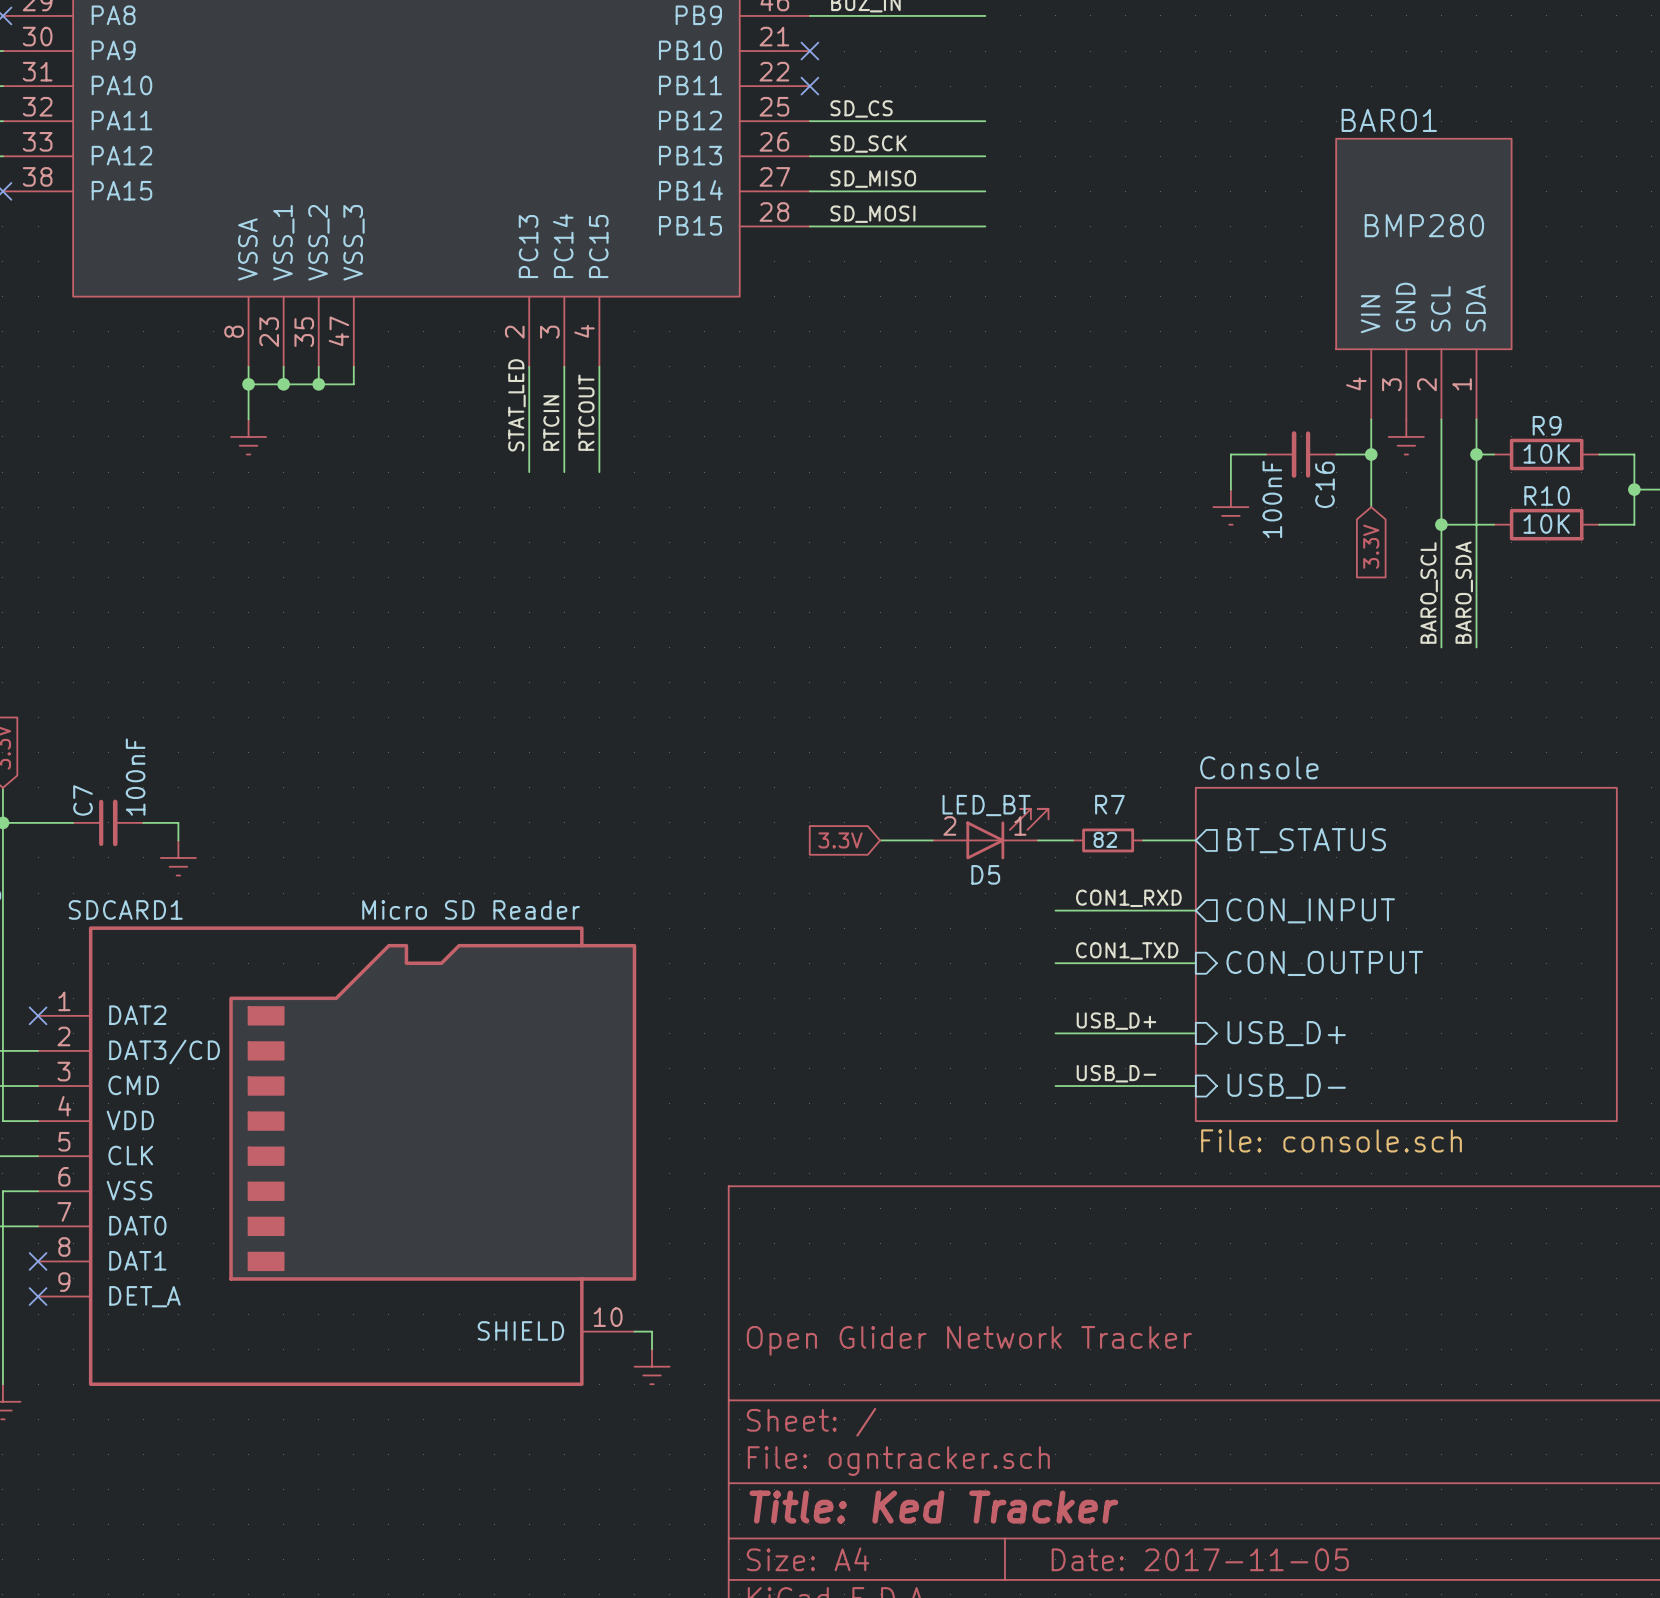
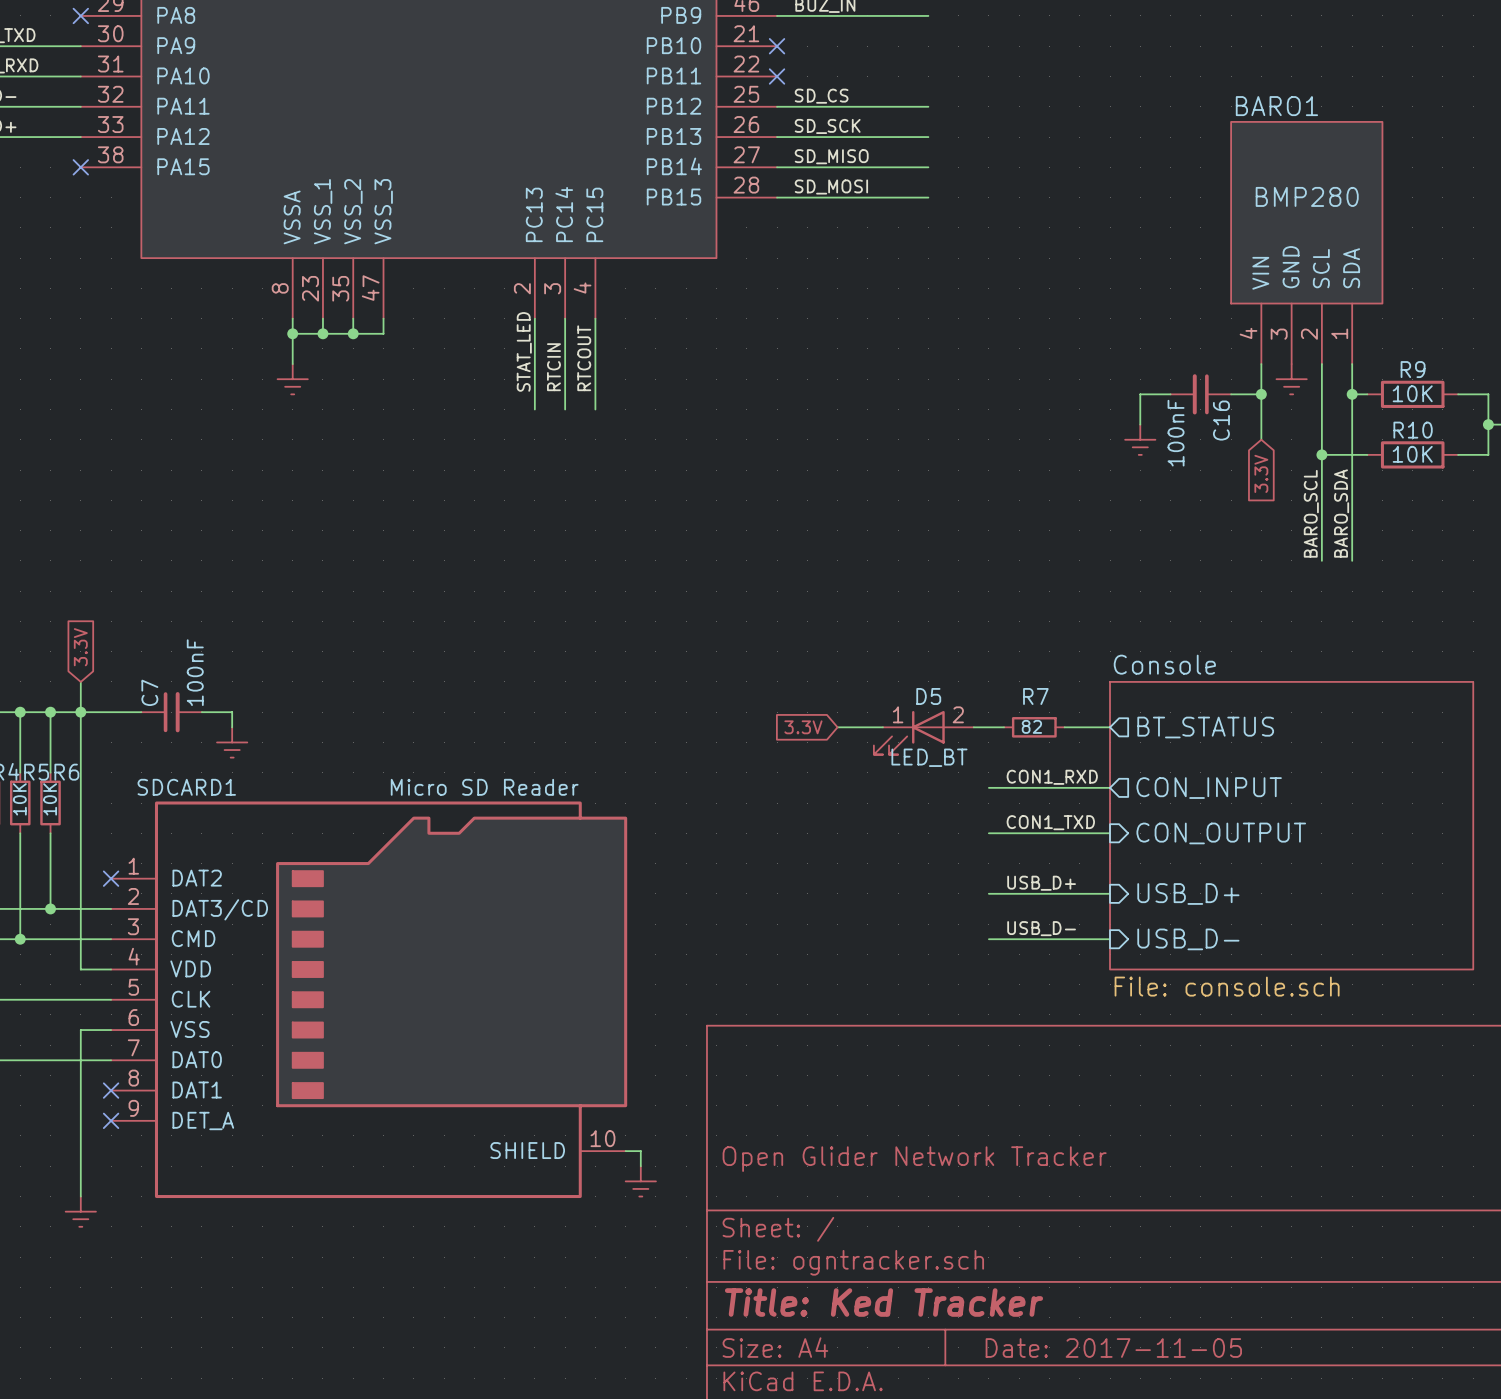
D5 rotation: 0° (1007, 834) -> 180° (909, 732)

